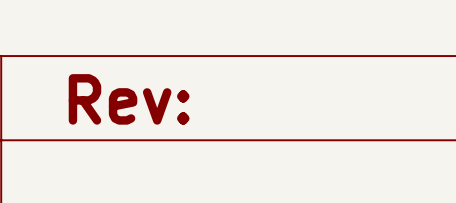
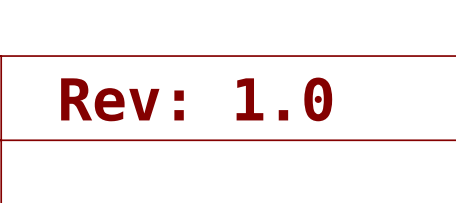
title block: Rev: (129, 99) -> Rev: 1.0 (196, 99)

